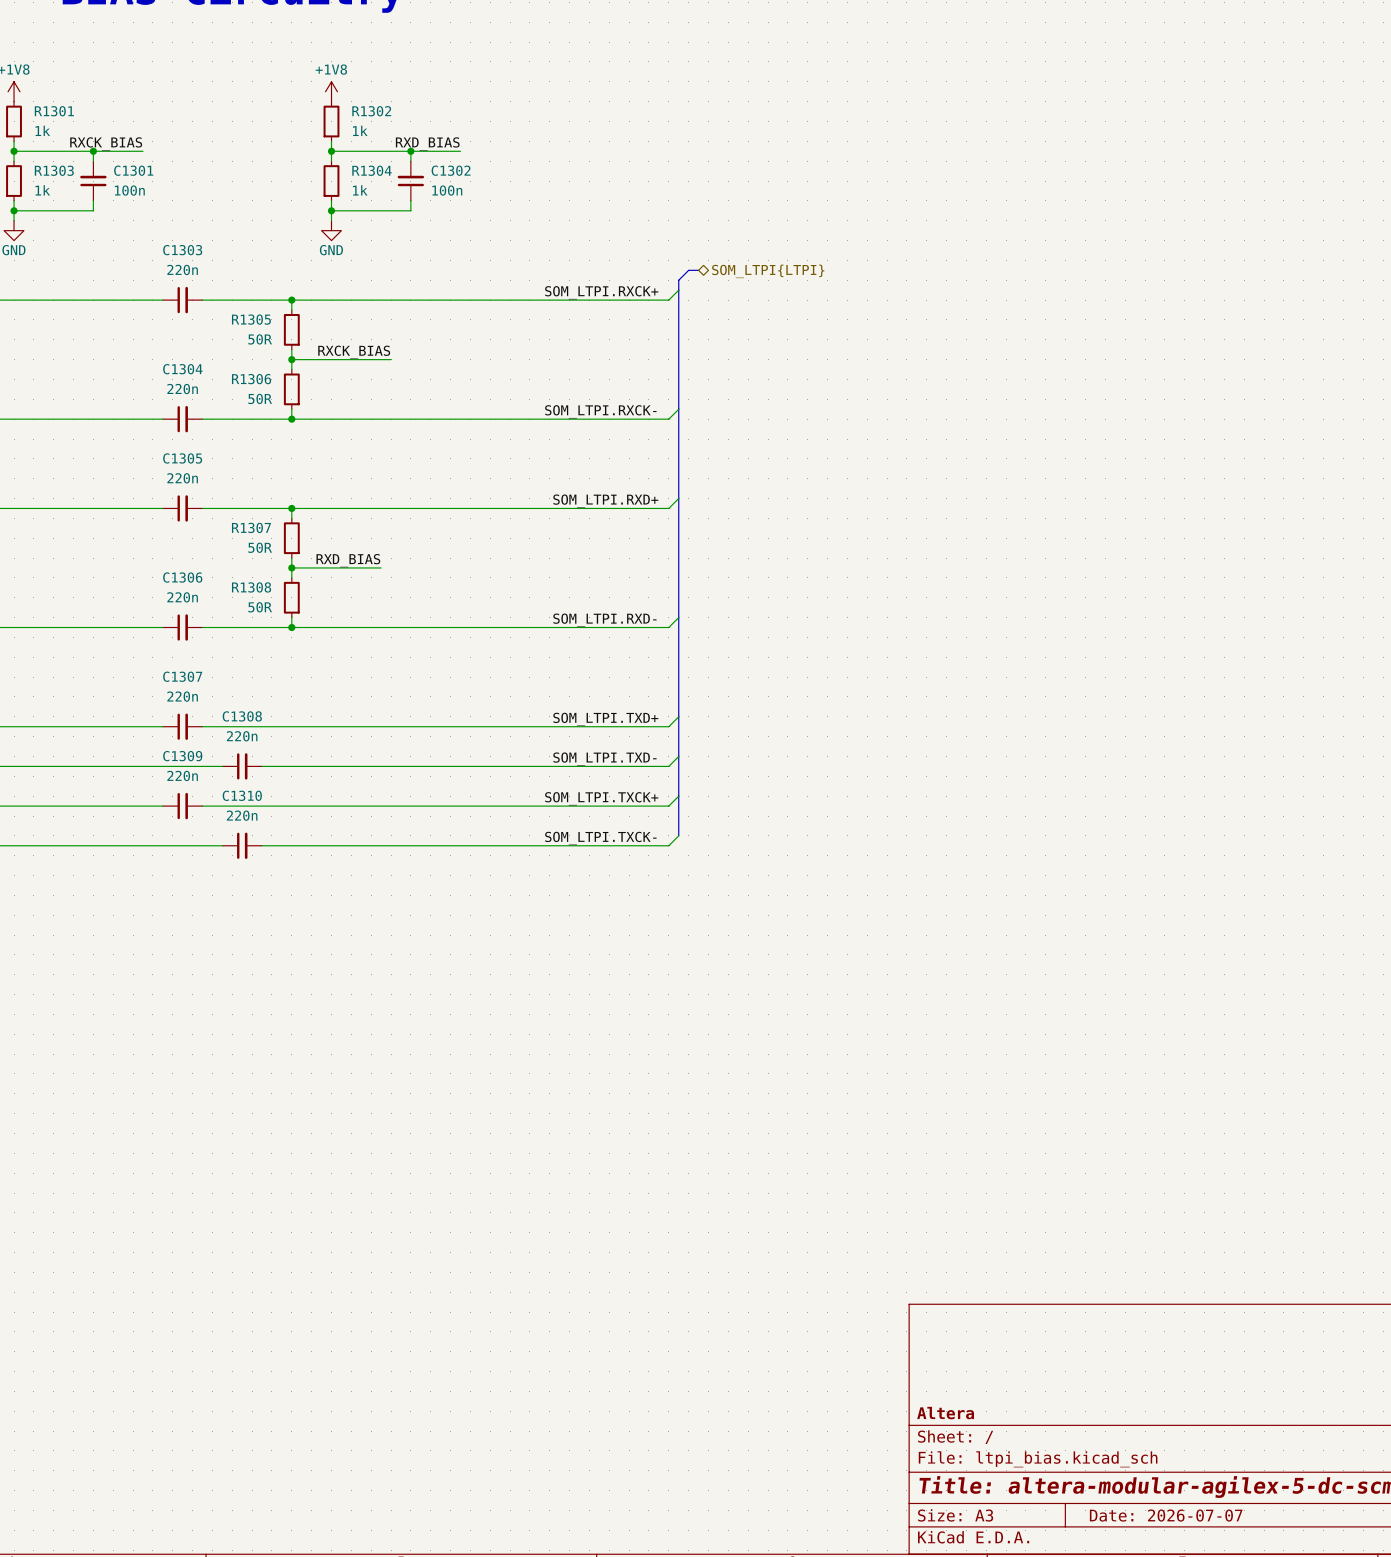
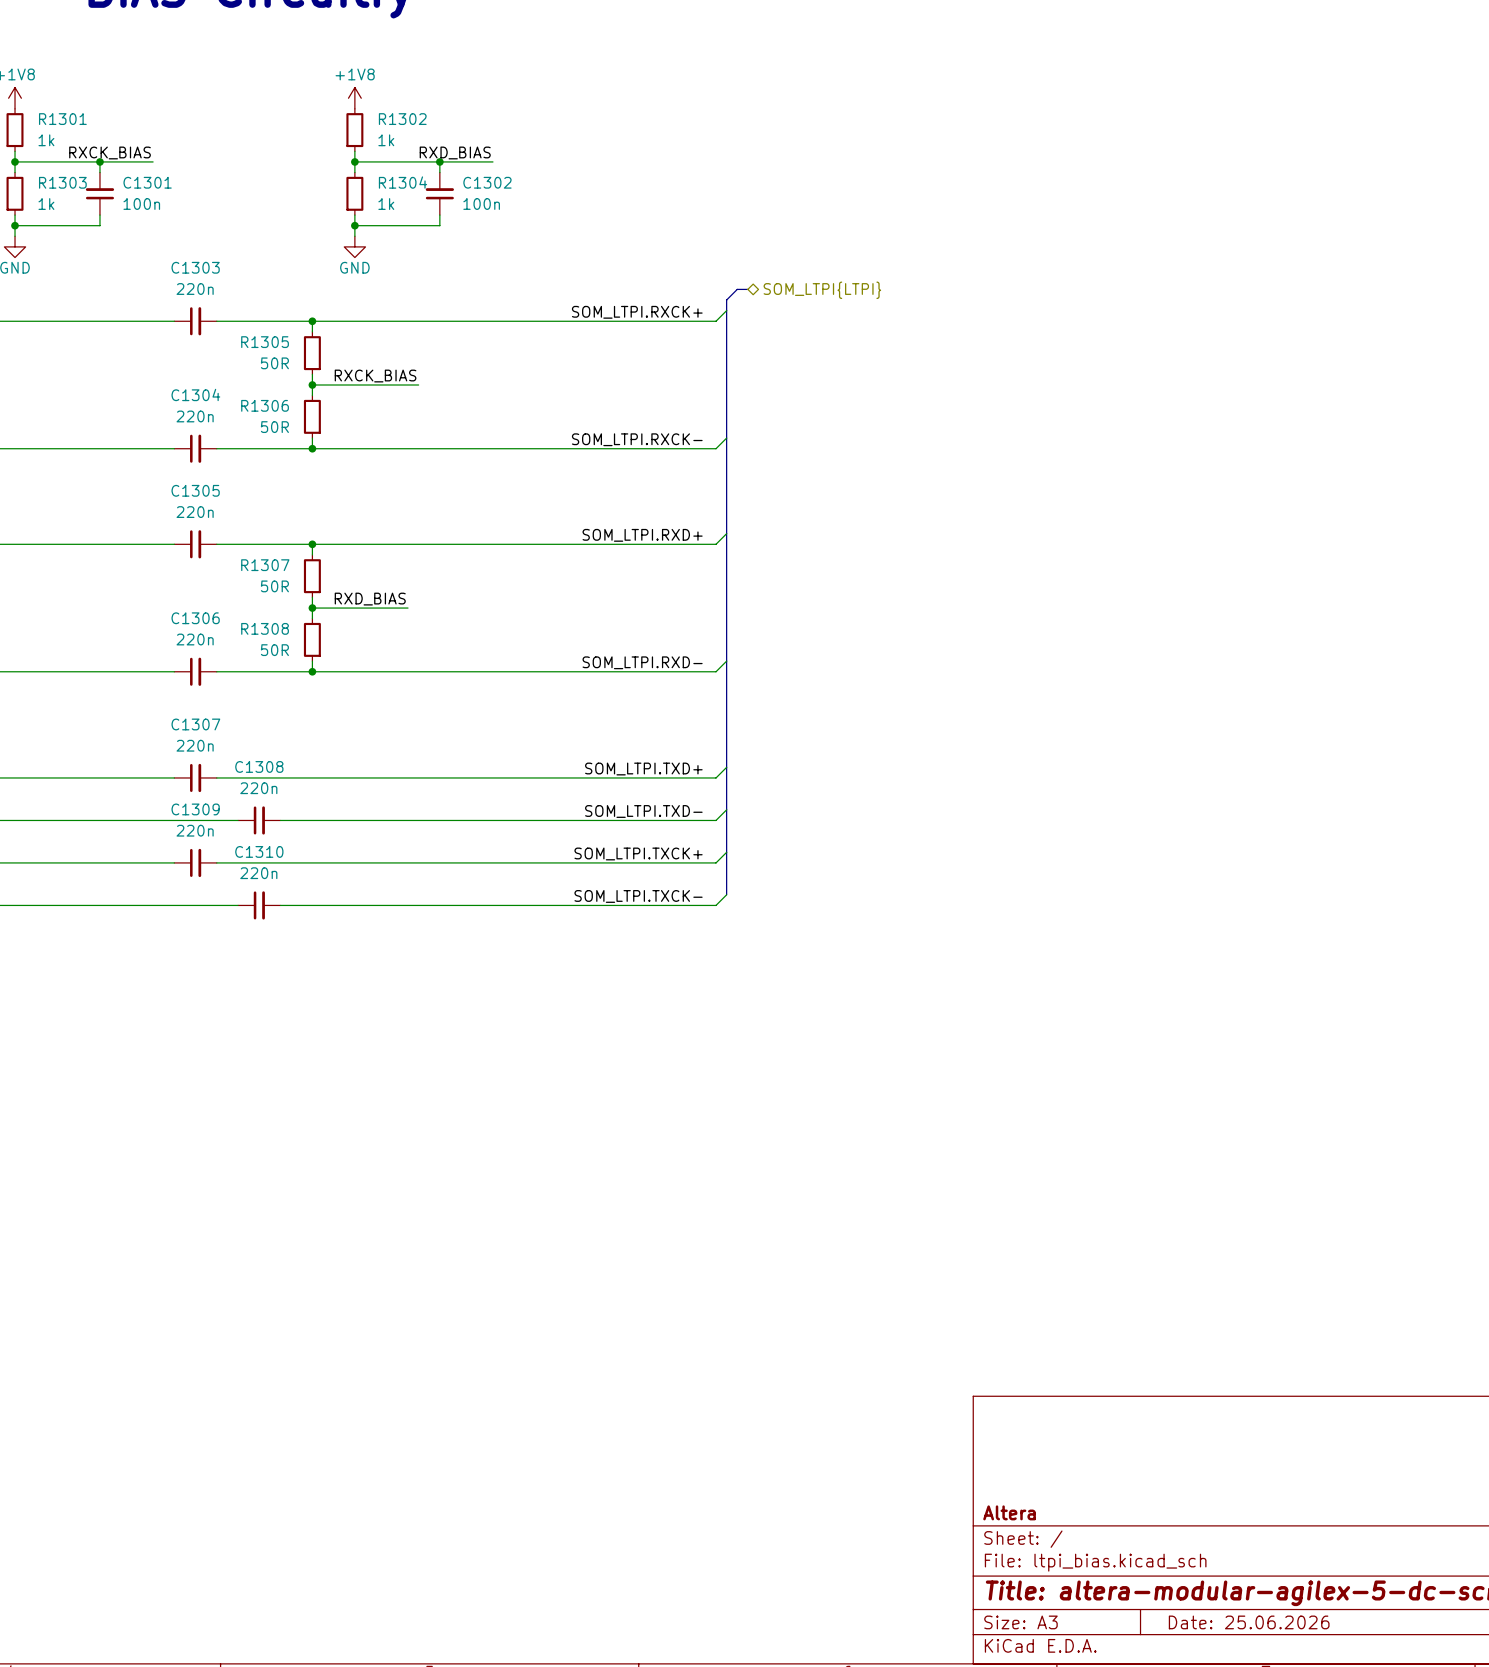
title block: Date: 2026-07-07 (1166, 1515) -> Date: 25.06.2026 (1249, 1622)

